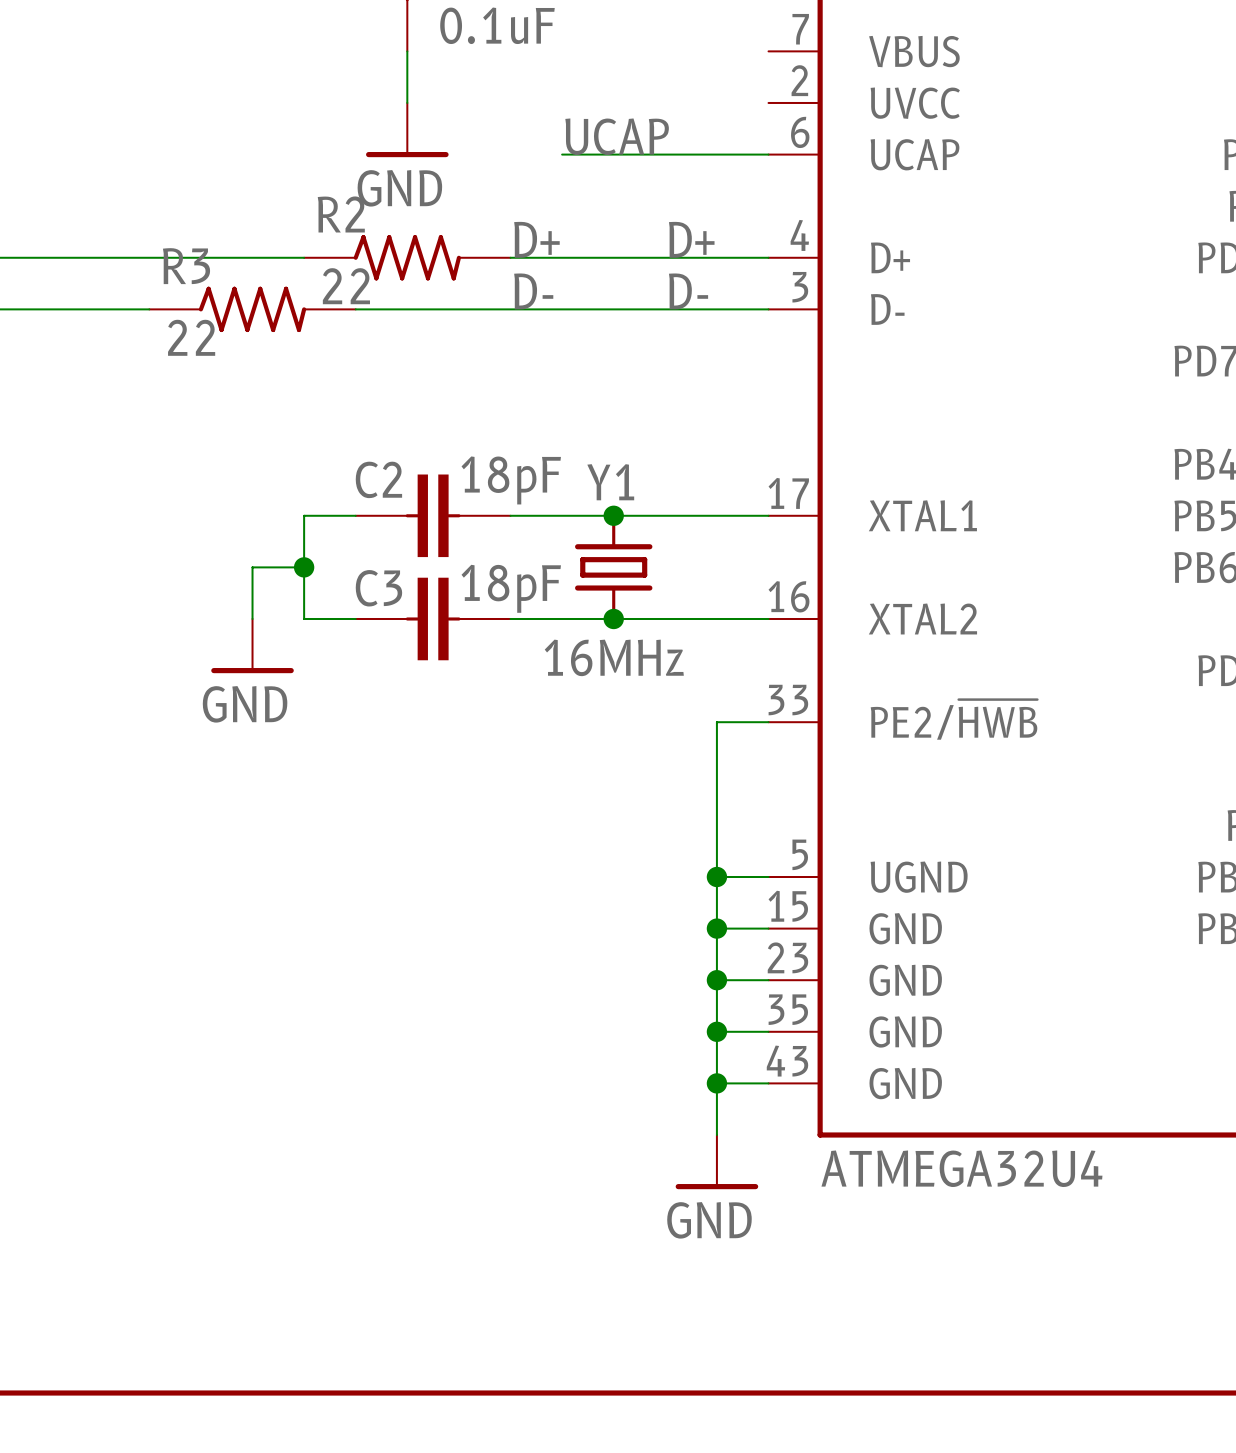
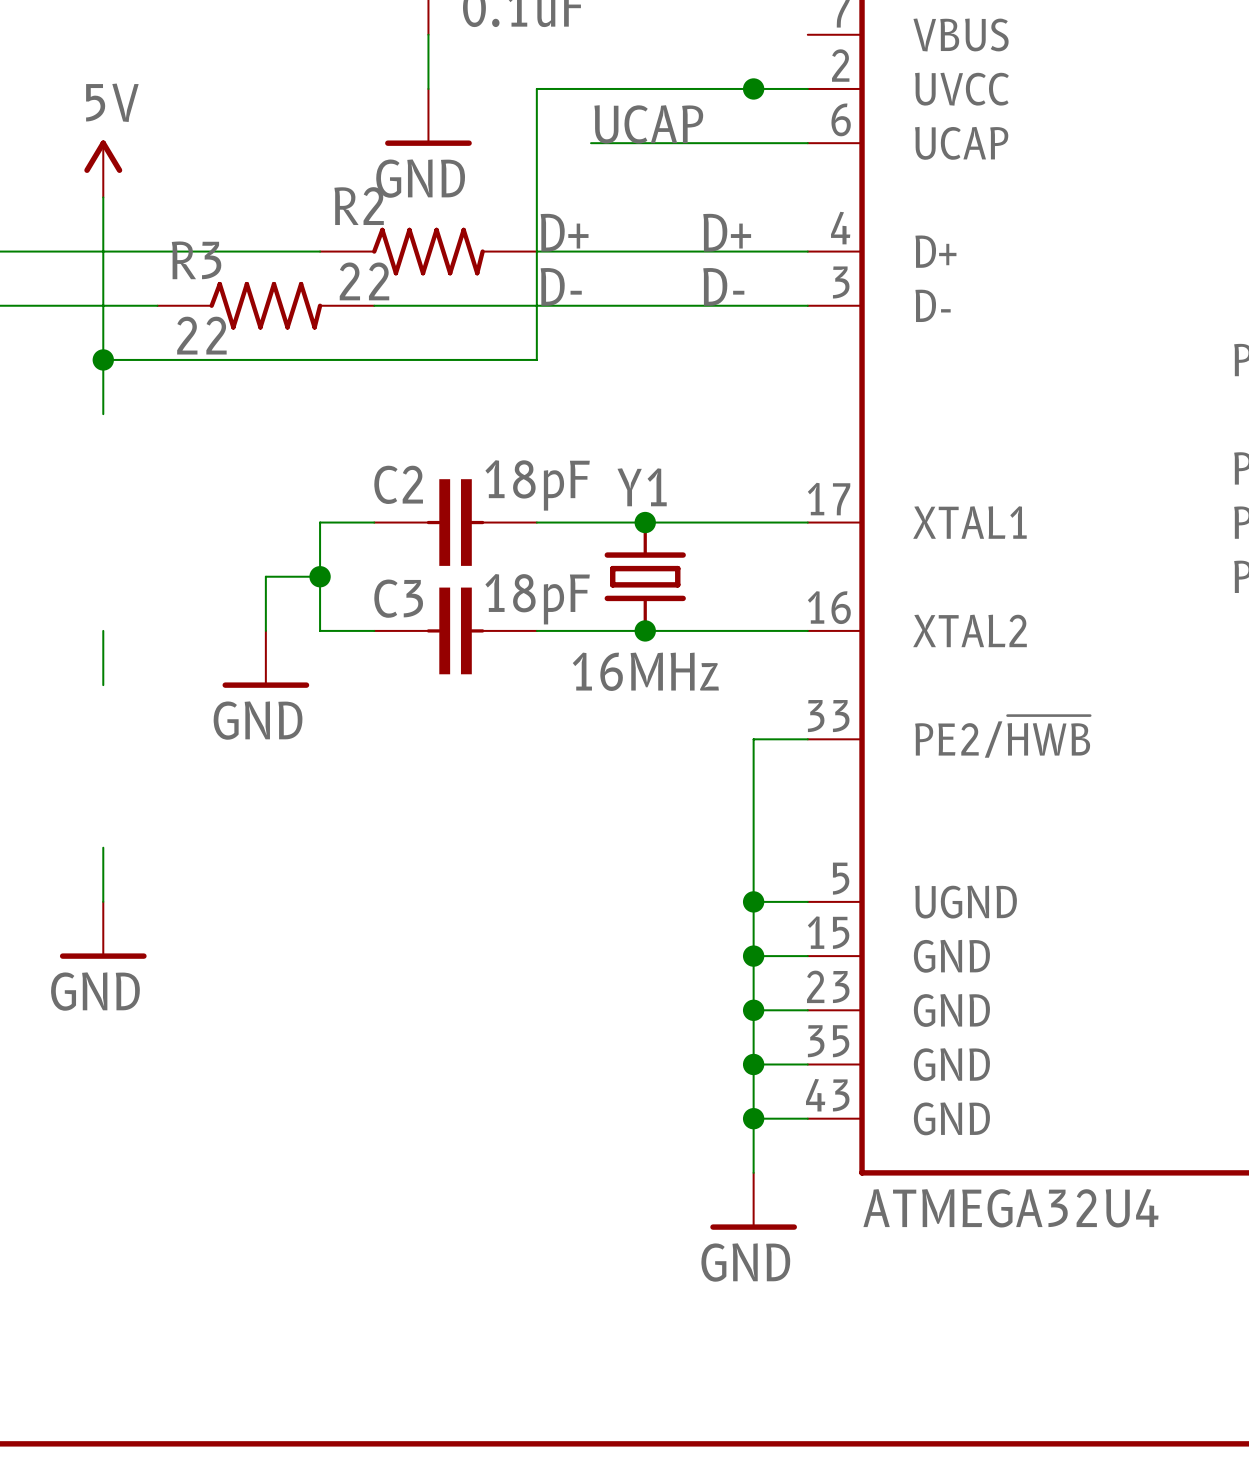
junction: none -> (753, 88)
wire: none -> (807, 88) (536, 88) (536, 359) (103, 359)
power symbol: none -> 5V (103, 168)
wire: none -> (103, 197) (103, 414)
junction: none -> (103, 359)
wire: none -> (103, 630) (103, 685)
wire: none -> (103, 847) (103, 901)
power symbol: none -> GND (103, 930)

